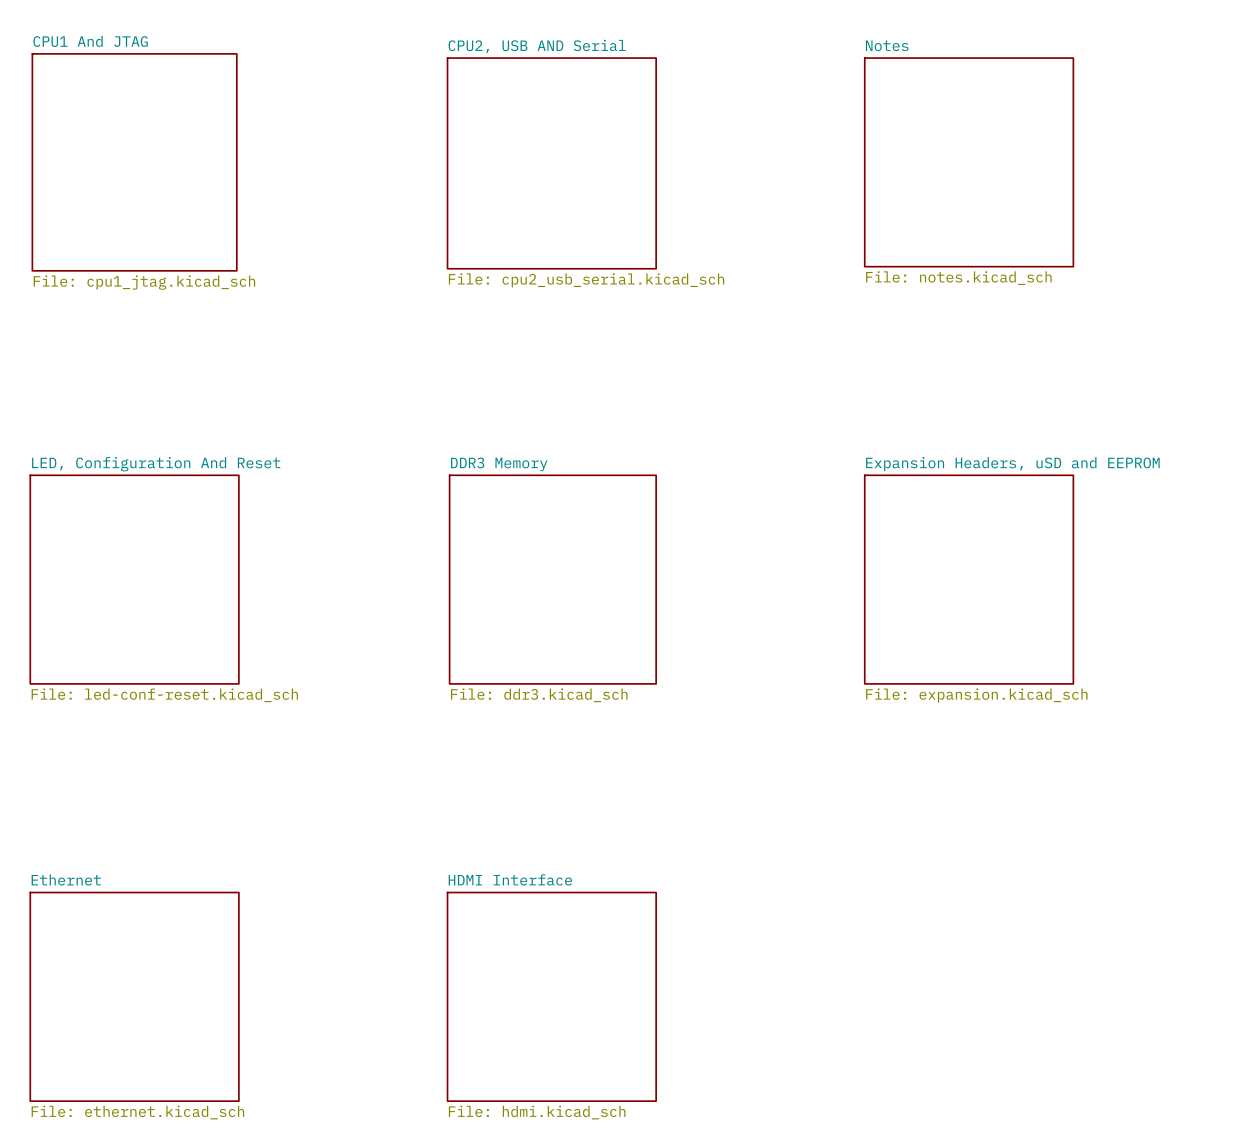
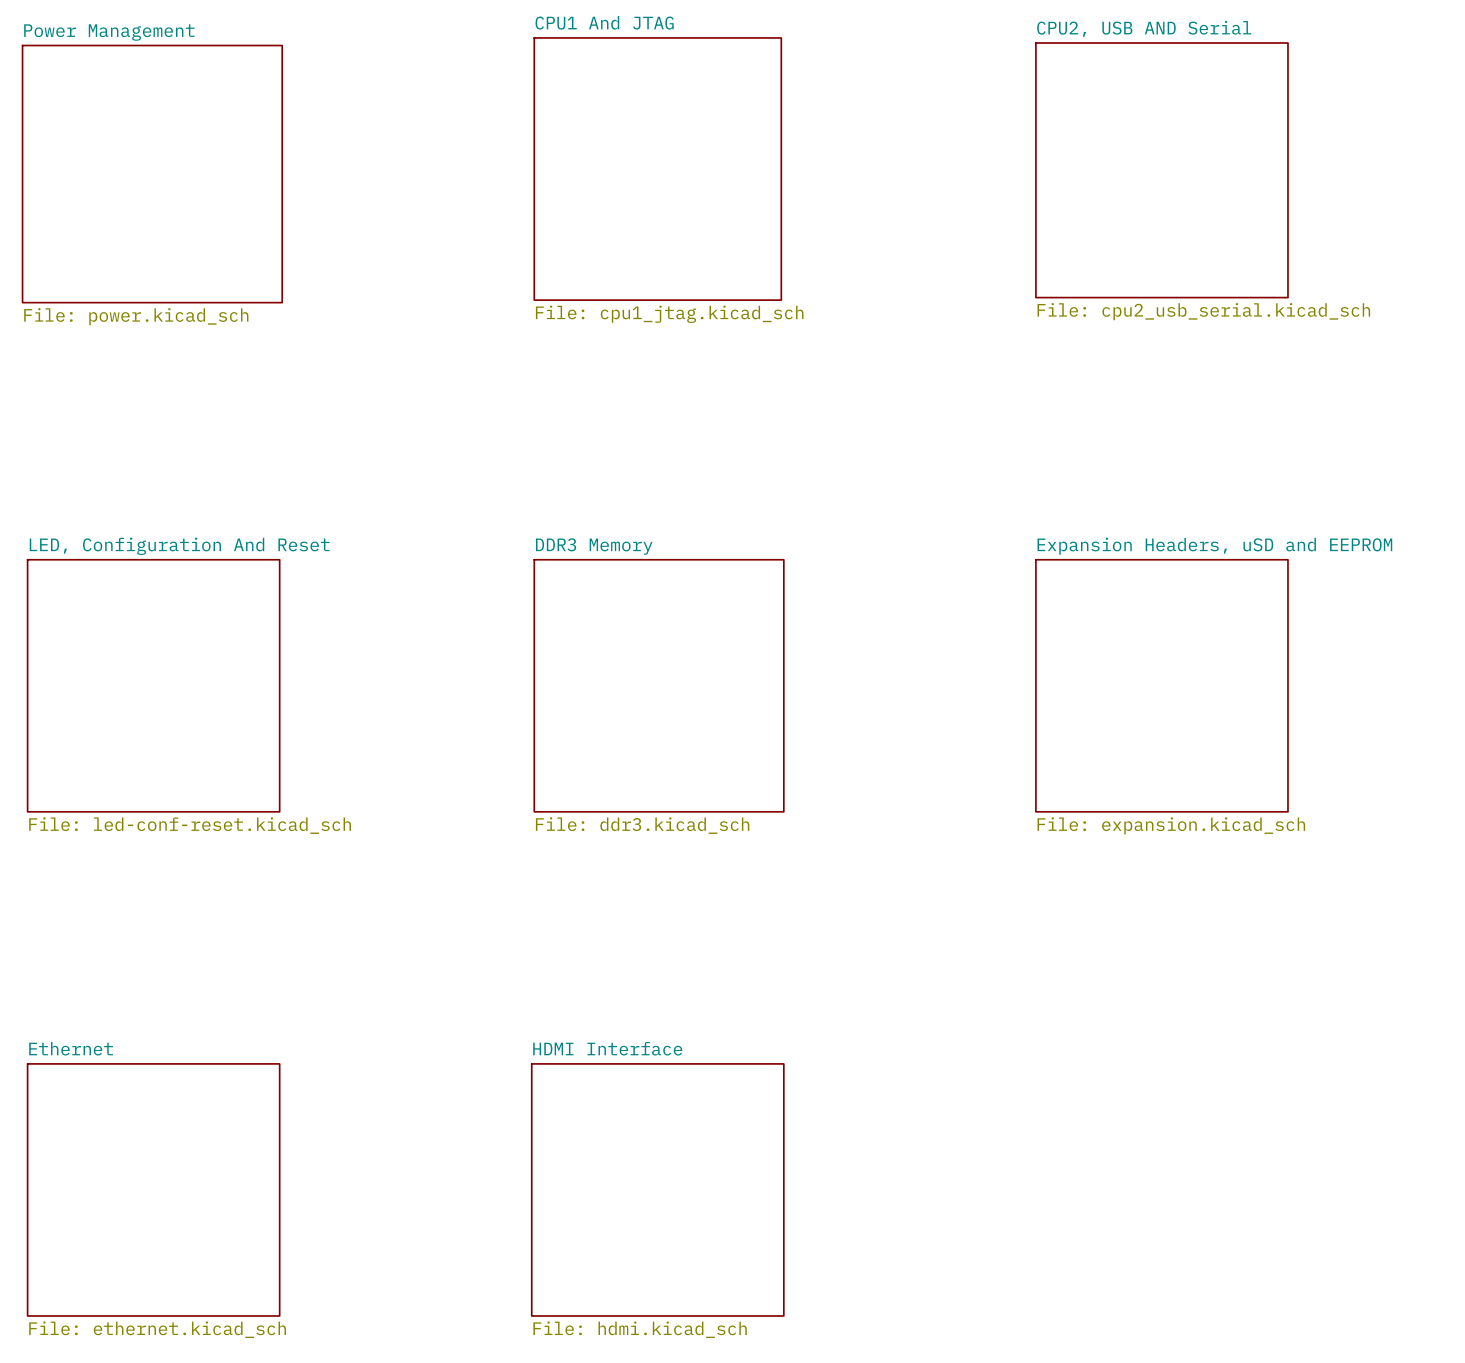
sheet Power Management: none -> File: power.kicad_sch (152, 174)
sheet CPU1 And JTAG position: (134, 162) -> (657, 169)
sheet Notes: File: notes.kicad_sch (969, 162) -> none
sheet CPU2, USB AND Serial position: (551, 163) -> (1161, 170)

